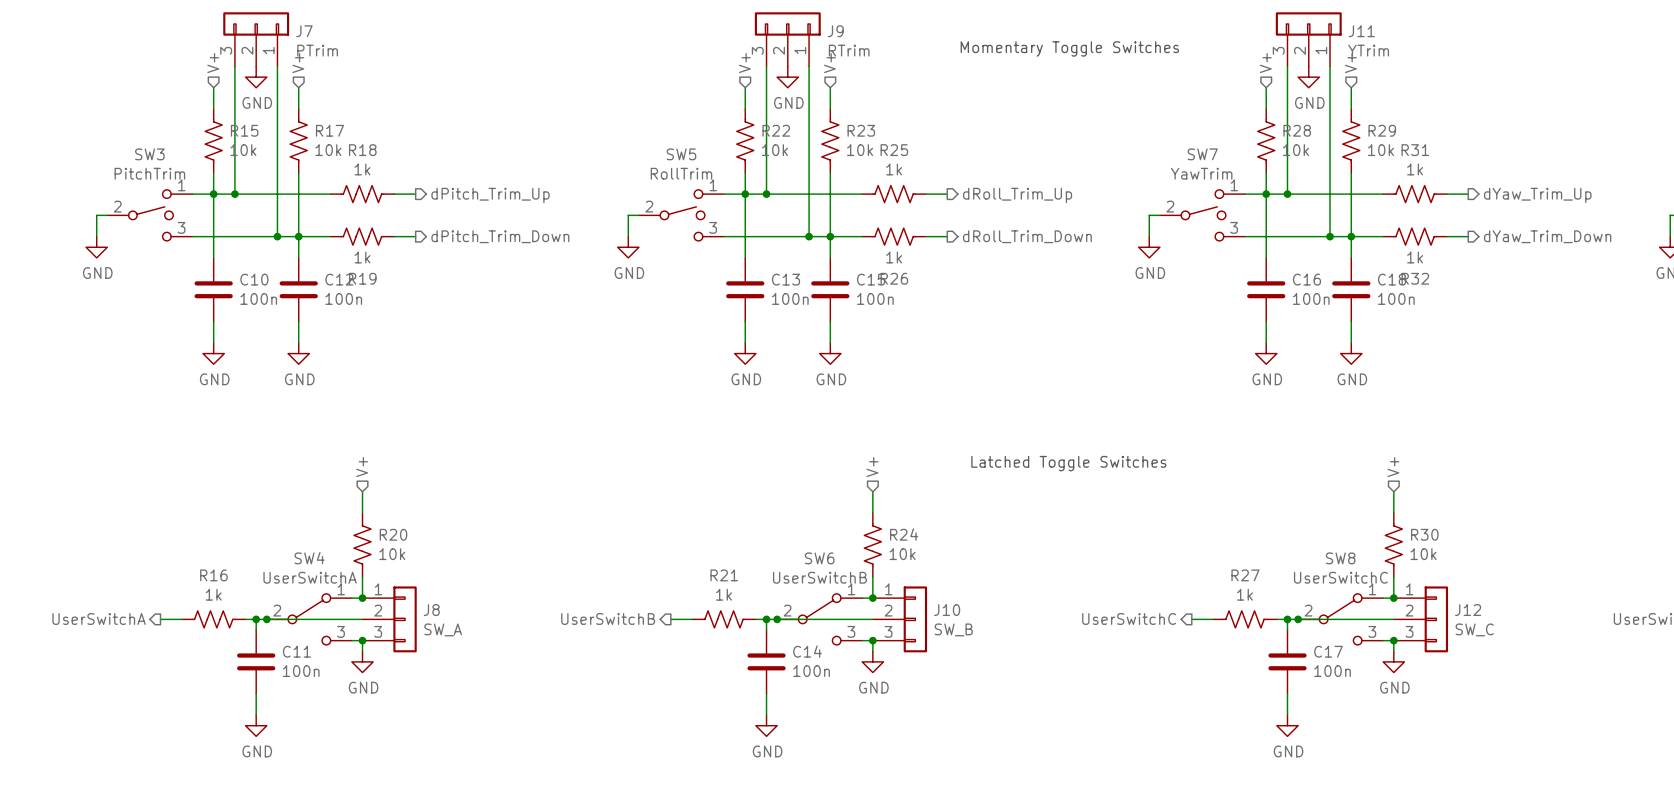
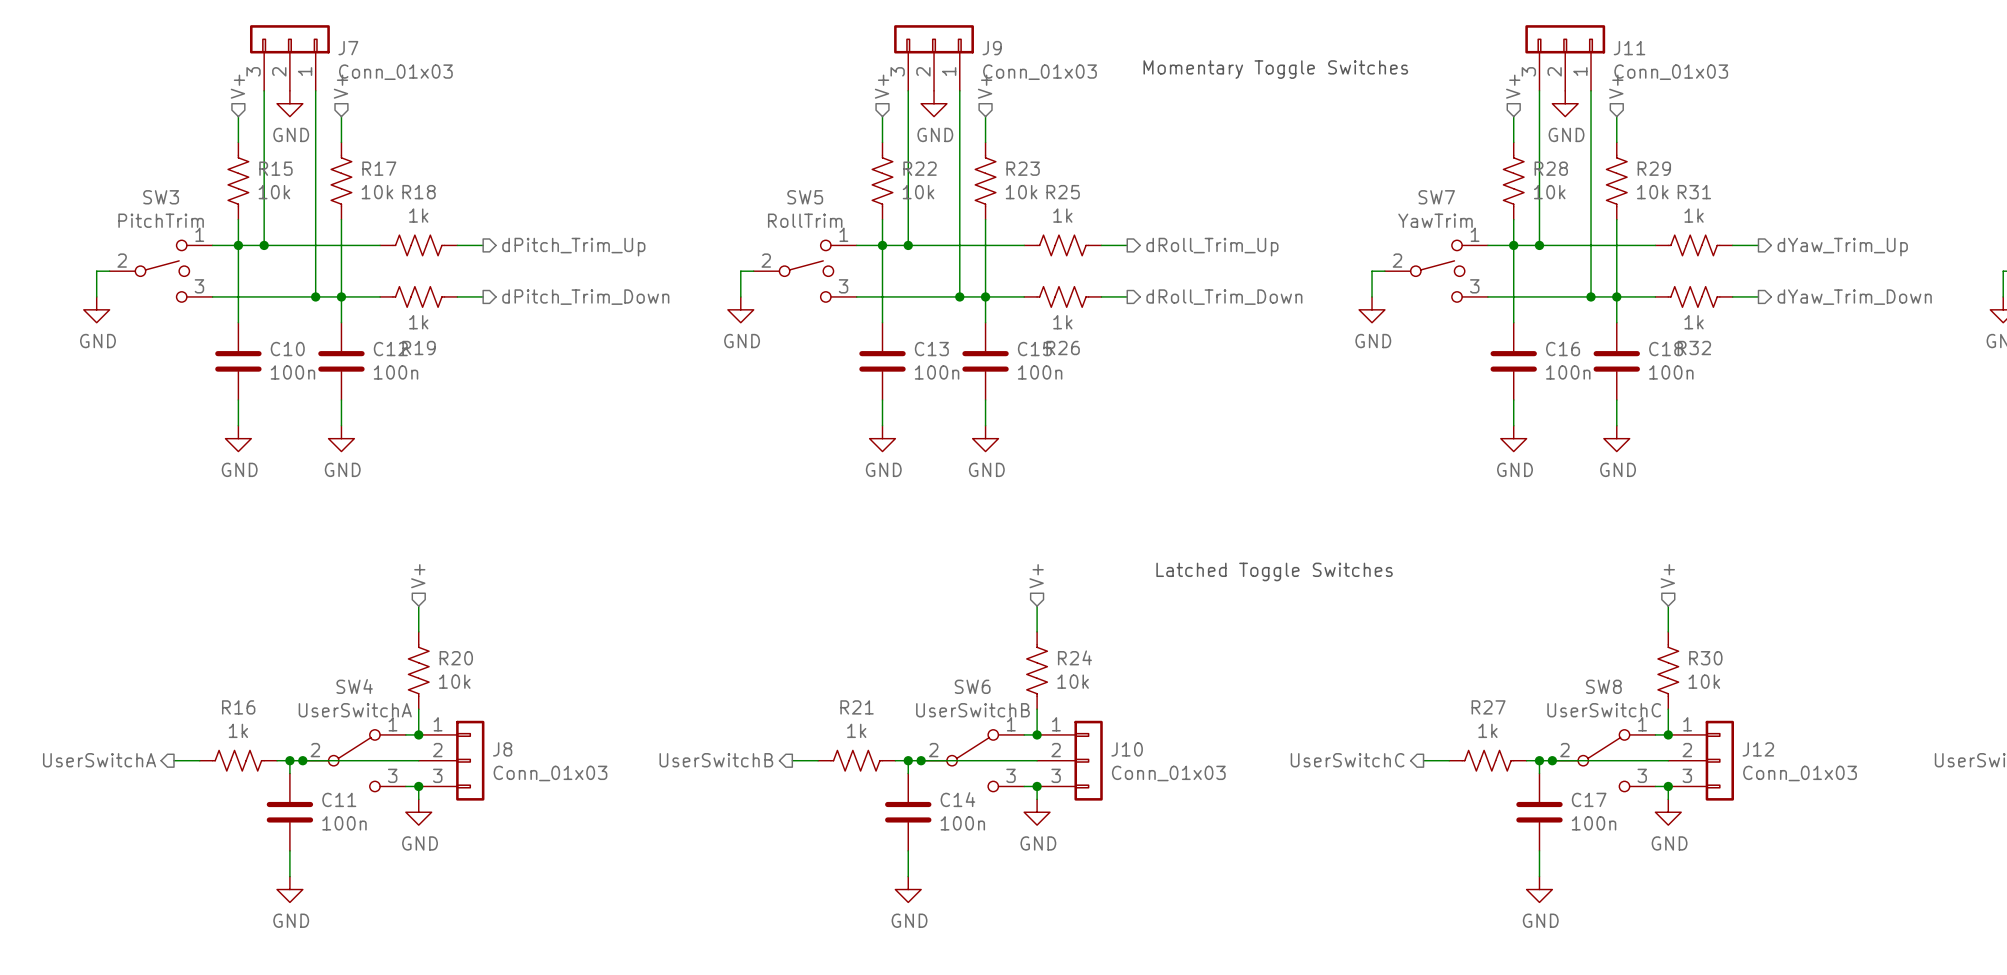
J7 value: PTrim (317, 50) -> Conn_01x03 (395, 72)
J9 value: RTrim (849, 50) -> Conn_01x03 (1040, 72)
J11 value: YTrim (1368, 50) -> Conn_01x03 (1671, 72)
J8 value: SW_A (443, 629) -> Conn_01x03 (550, 773)
J10 value: SW_B (953, 629) -> Conn_01x03 (1168, 773)
J12 value: SW_C (1474, 629) -> Conn_01x03 (1800, 773)

